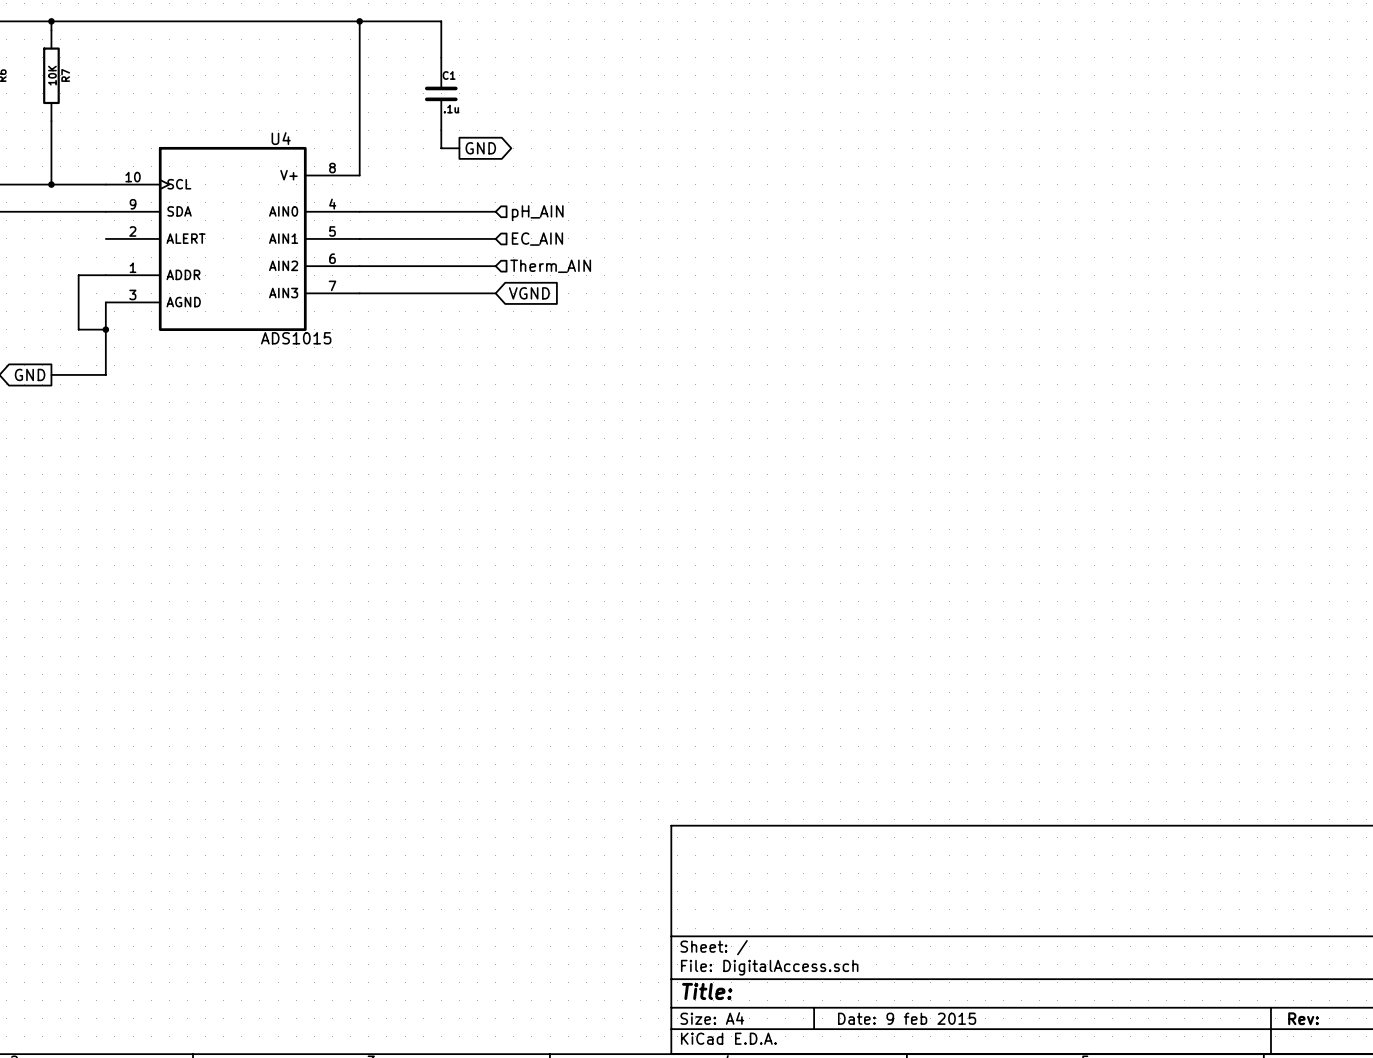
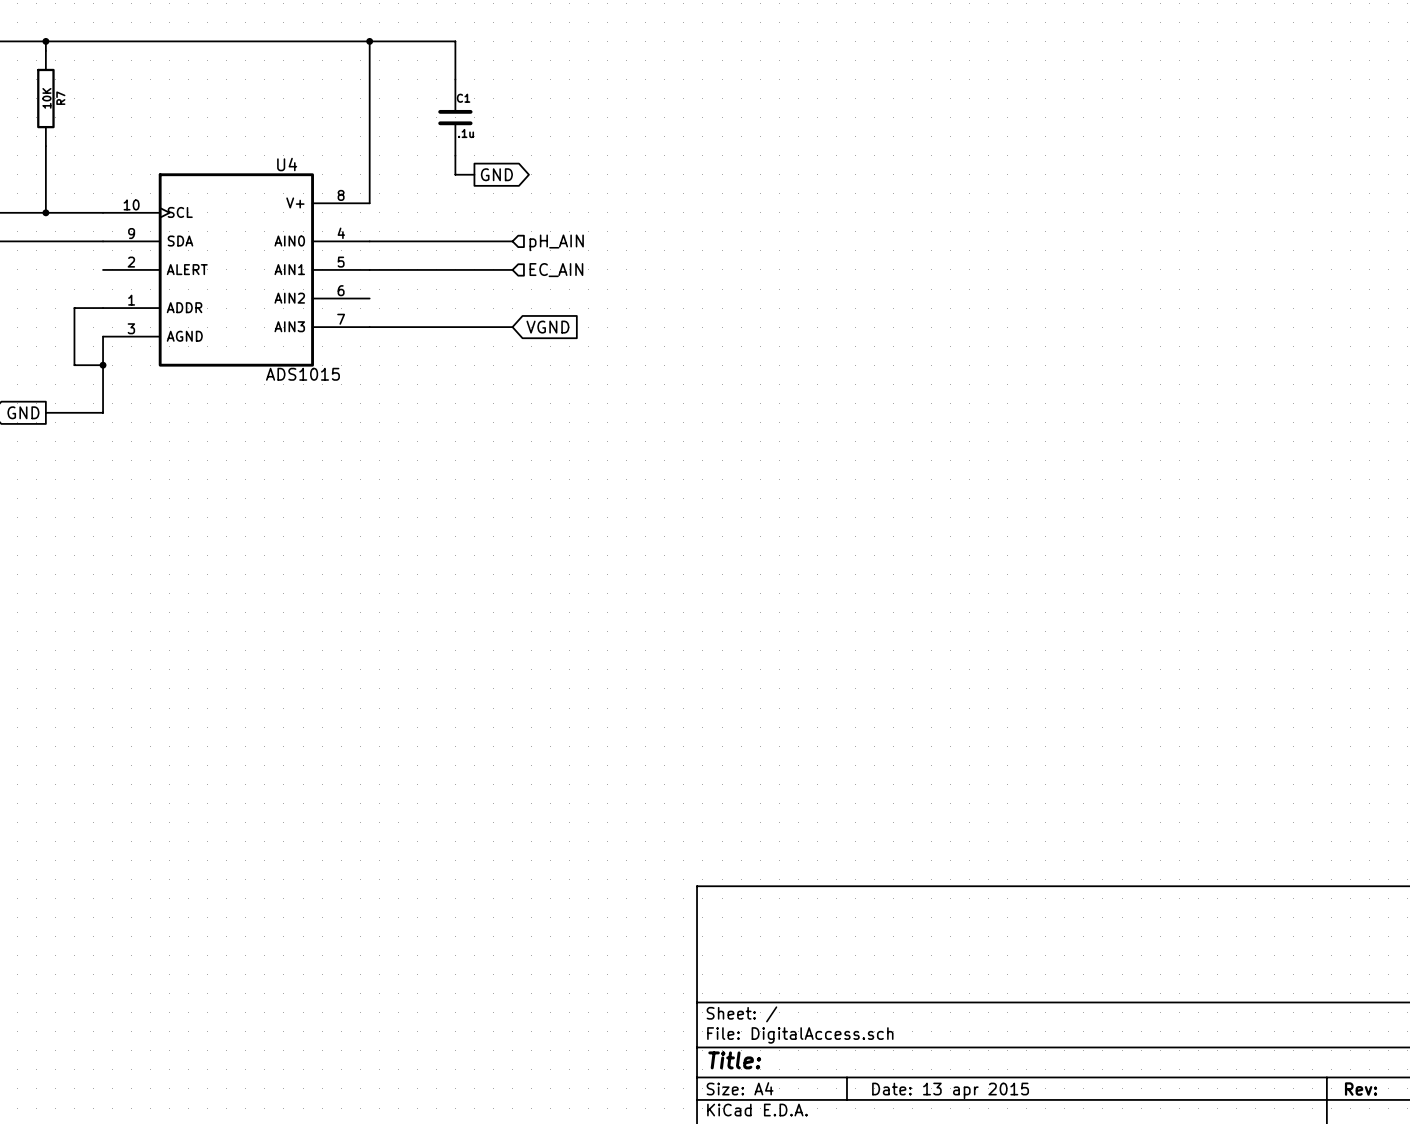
wire: (359, 266) (495, 266) -> none
hierarchical label: Therm_AIN (550, 266) -> none
title block: Date: 9 feb 2015 (907, 1018) -> Date: 13 apr 2015 (950, 1090)

